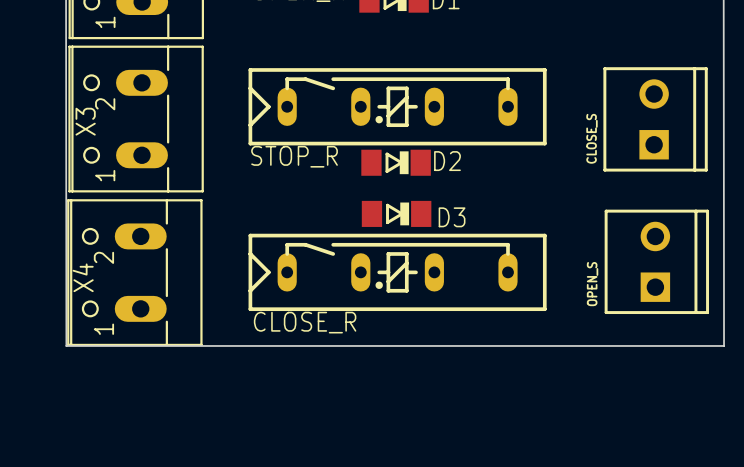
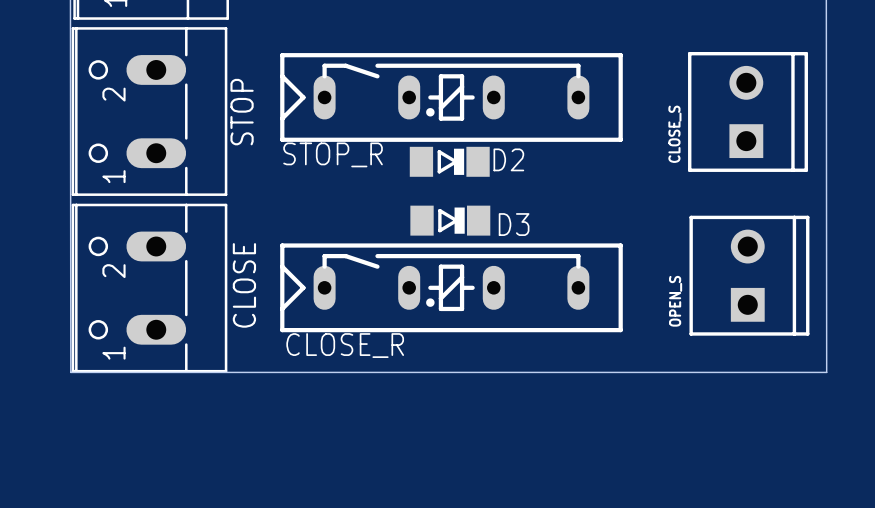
STOP: none -> (149, 111)
X3: (136, 119) -> none
X4 name: X4 (83, 277) -> CLOSE (244, 285)

